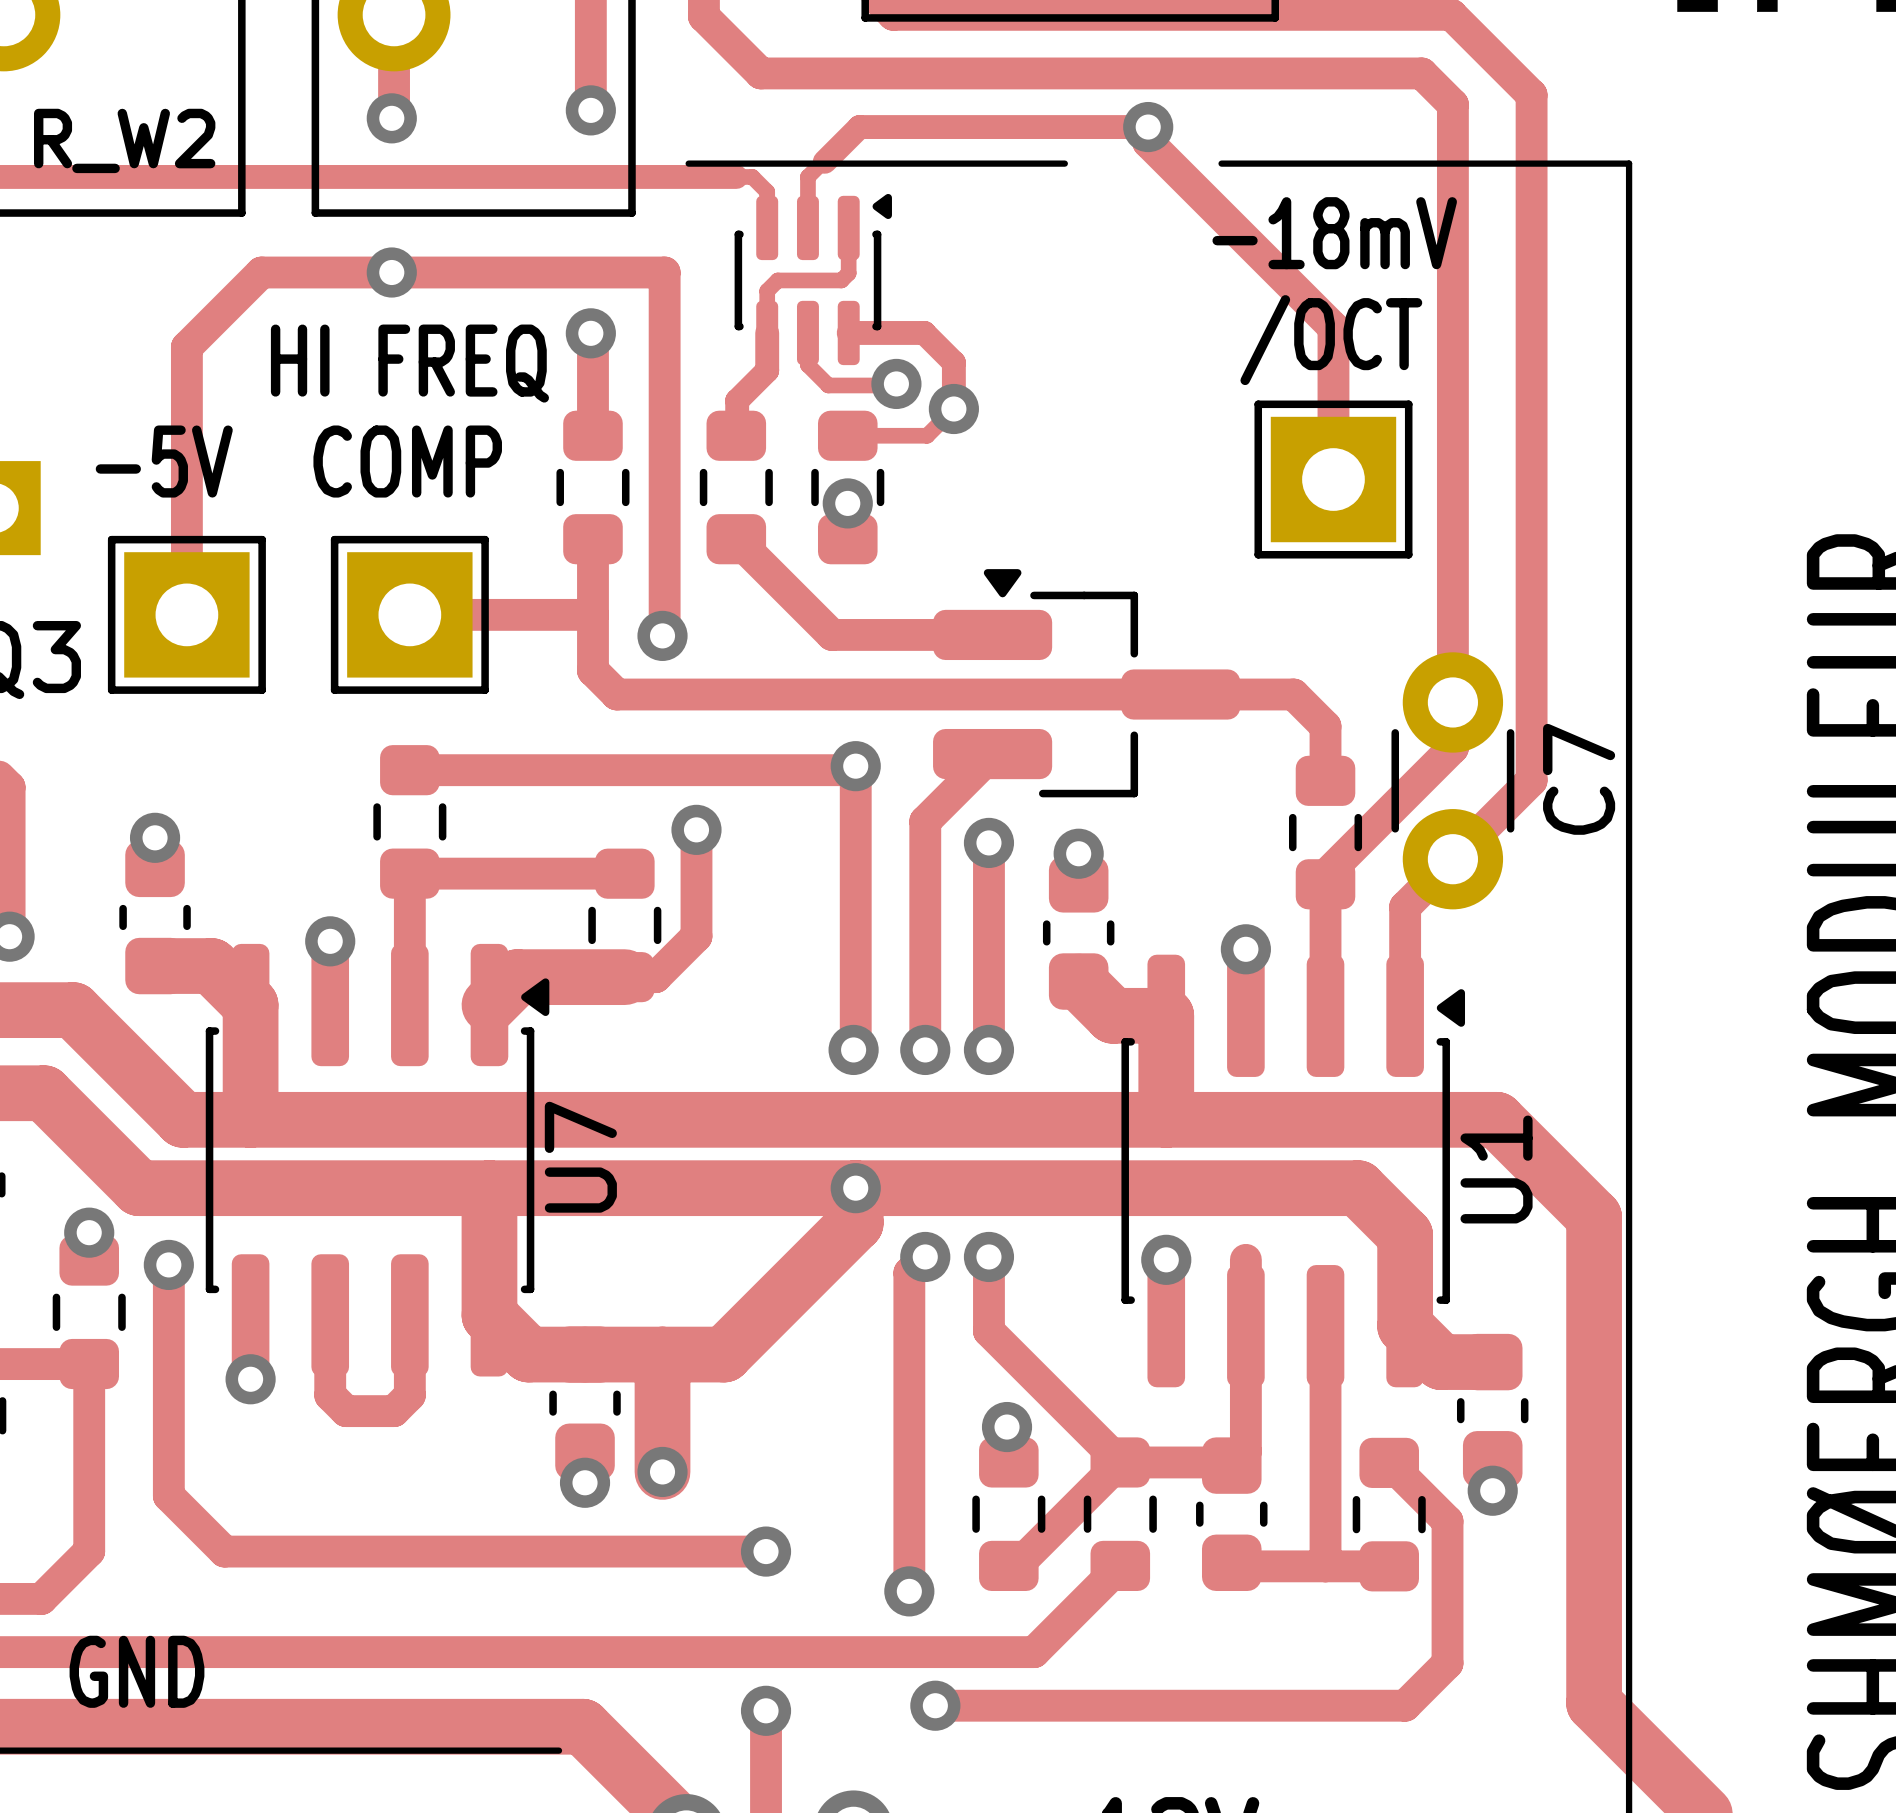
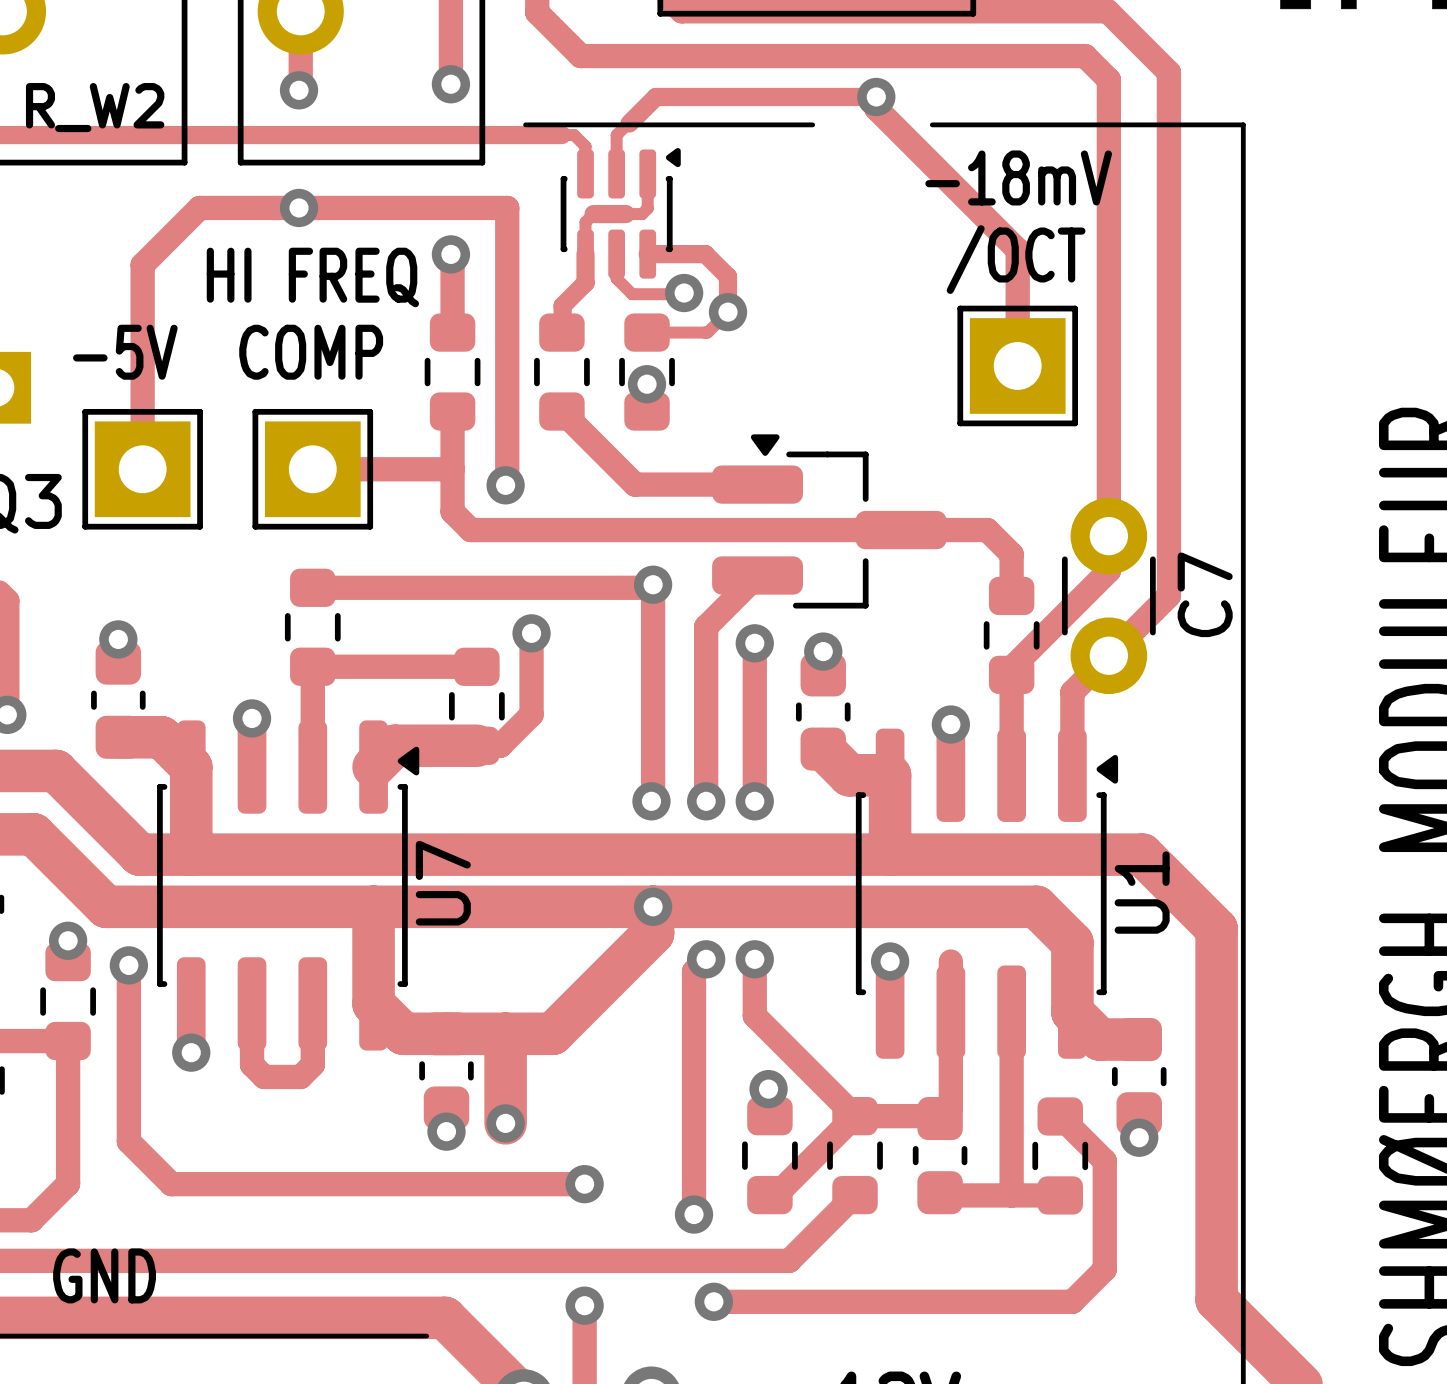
track width: thin (777, 280) (820, 280) -> thick (593, 214) (625, 214)

